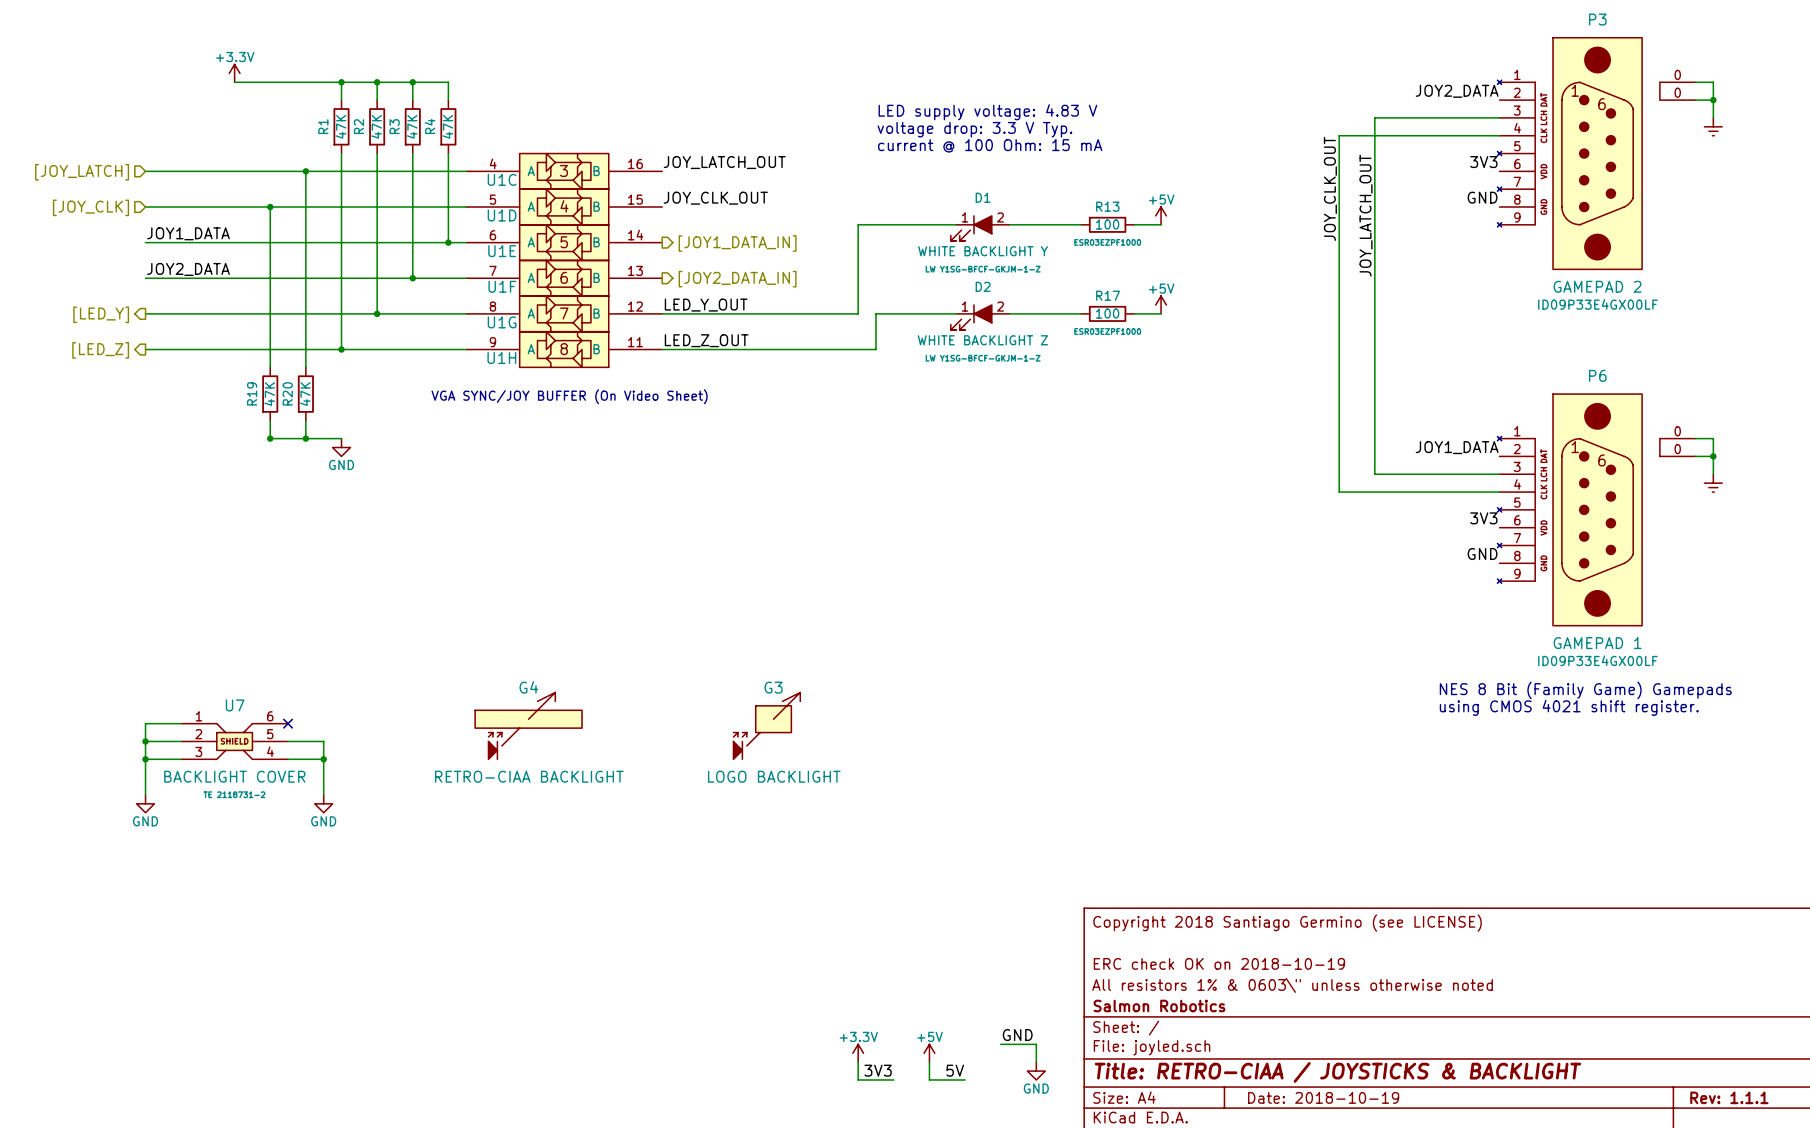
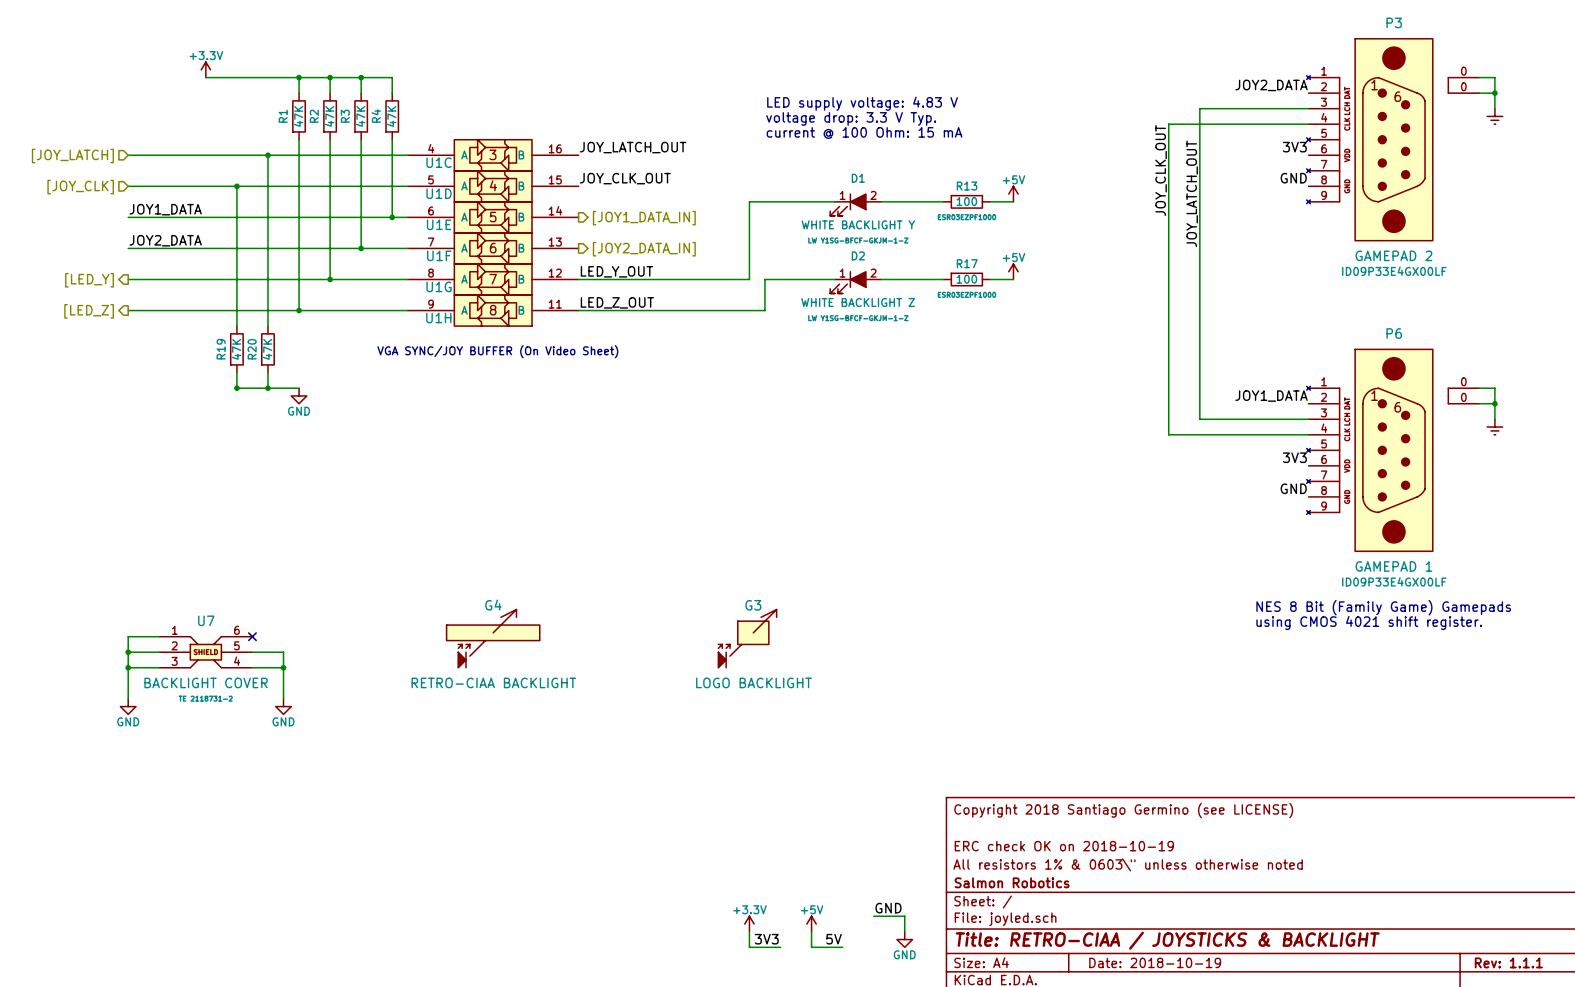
G4 position: (528, 725) -> (493, 638)
G3 position: (766, 725) -> (747, 638)

